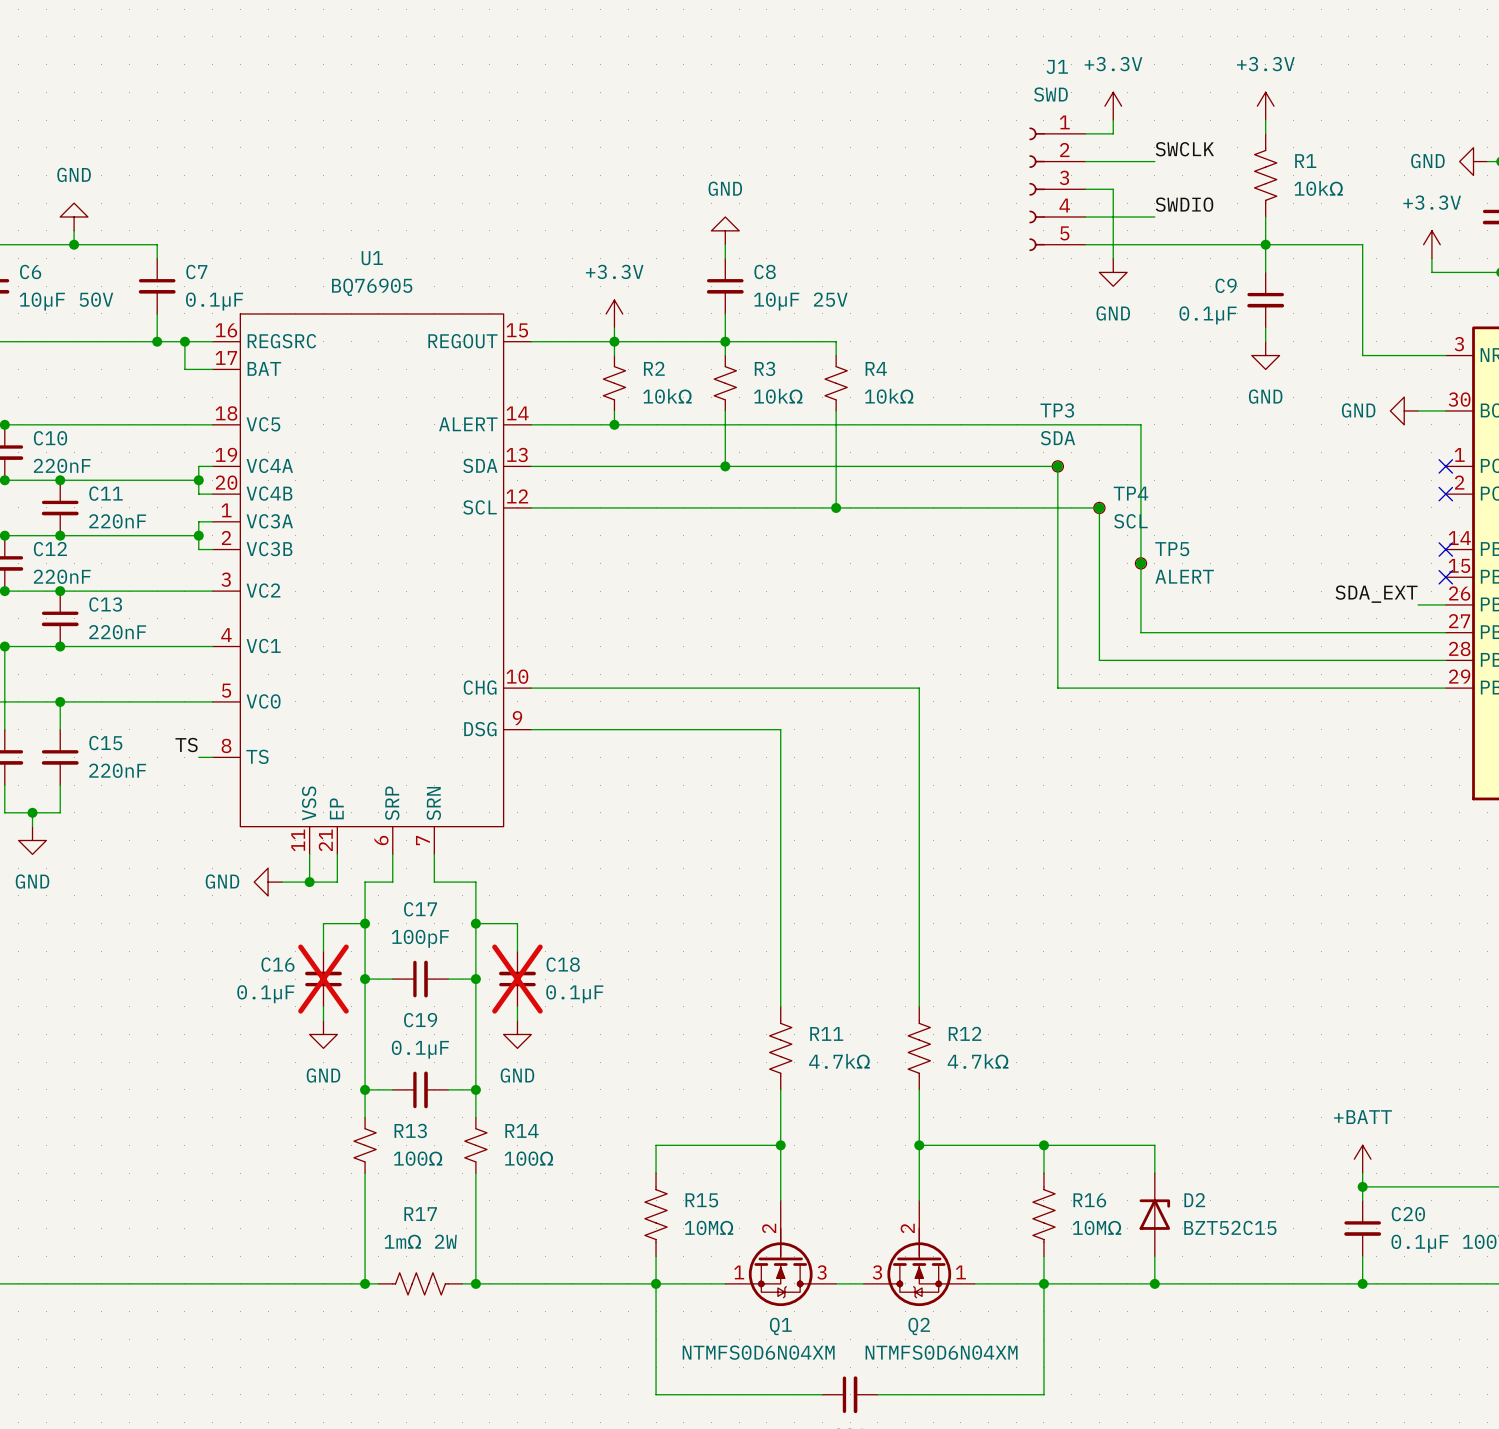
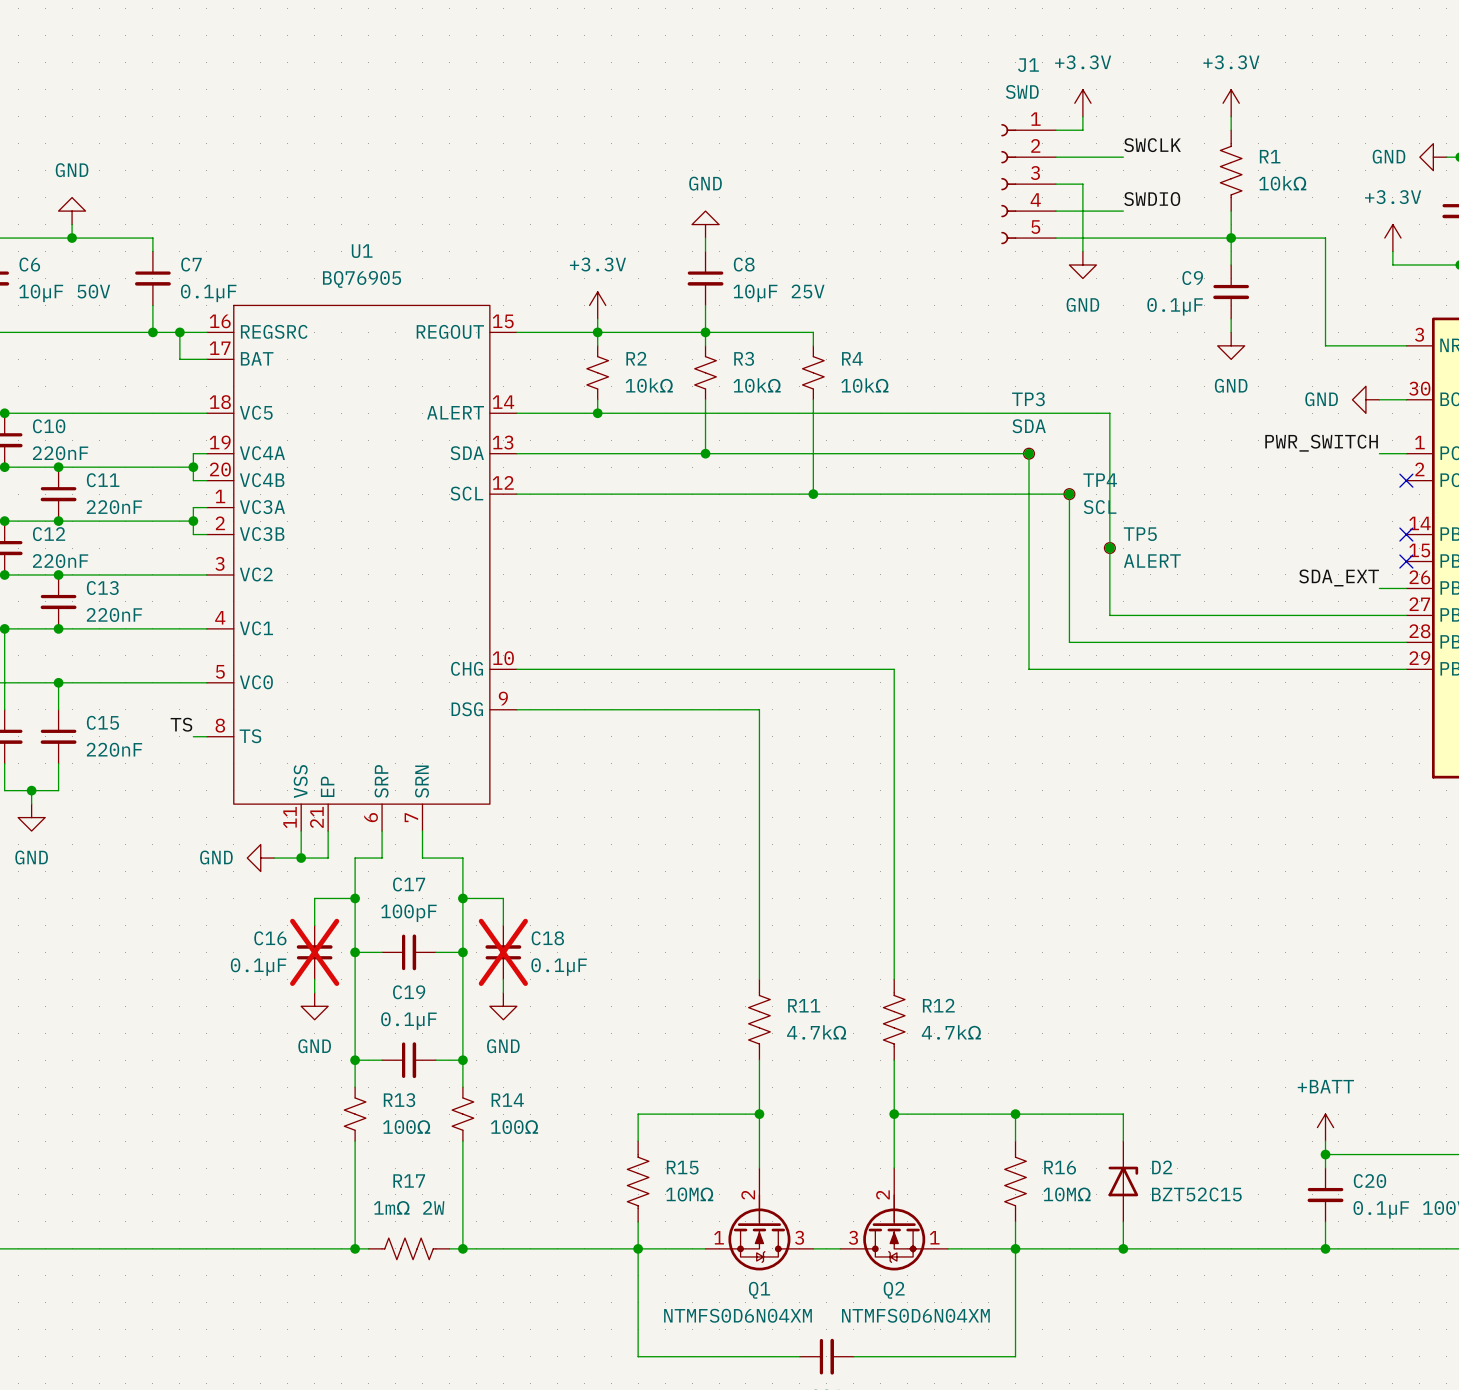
label: none -> PWR_SWITCH (1321, 443)
wire: none -> (1379, 453) (1406, 453)
no-connect mark: (1445, 466) -> none

